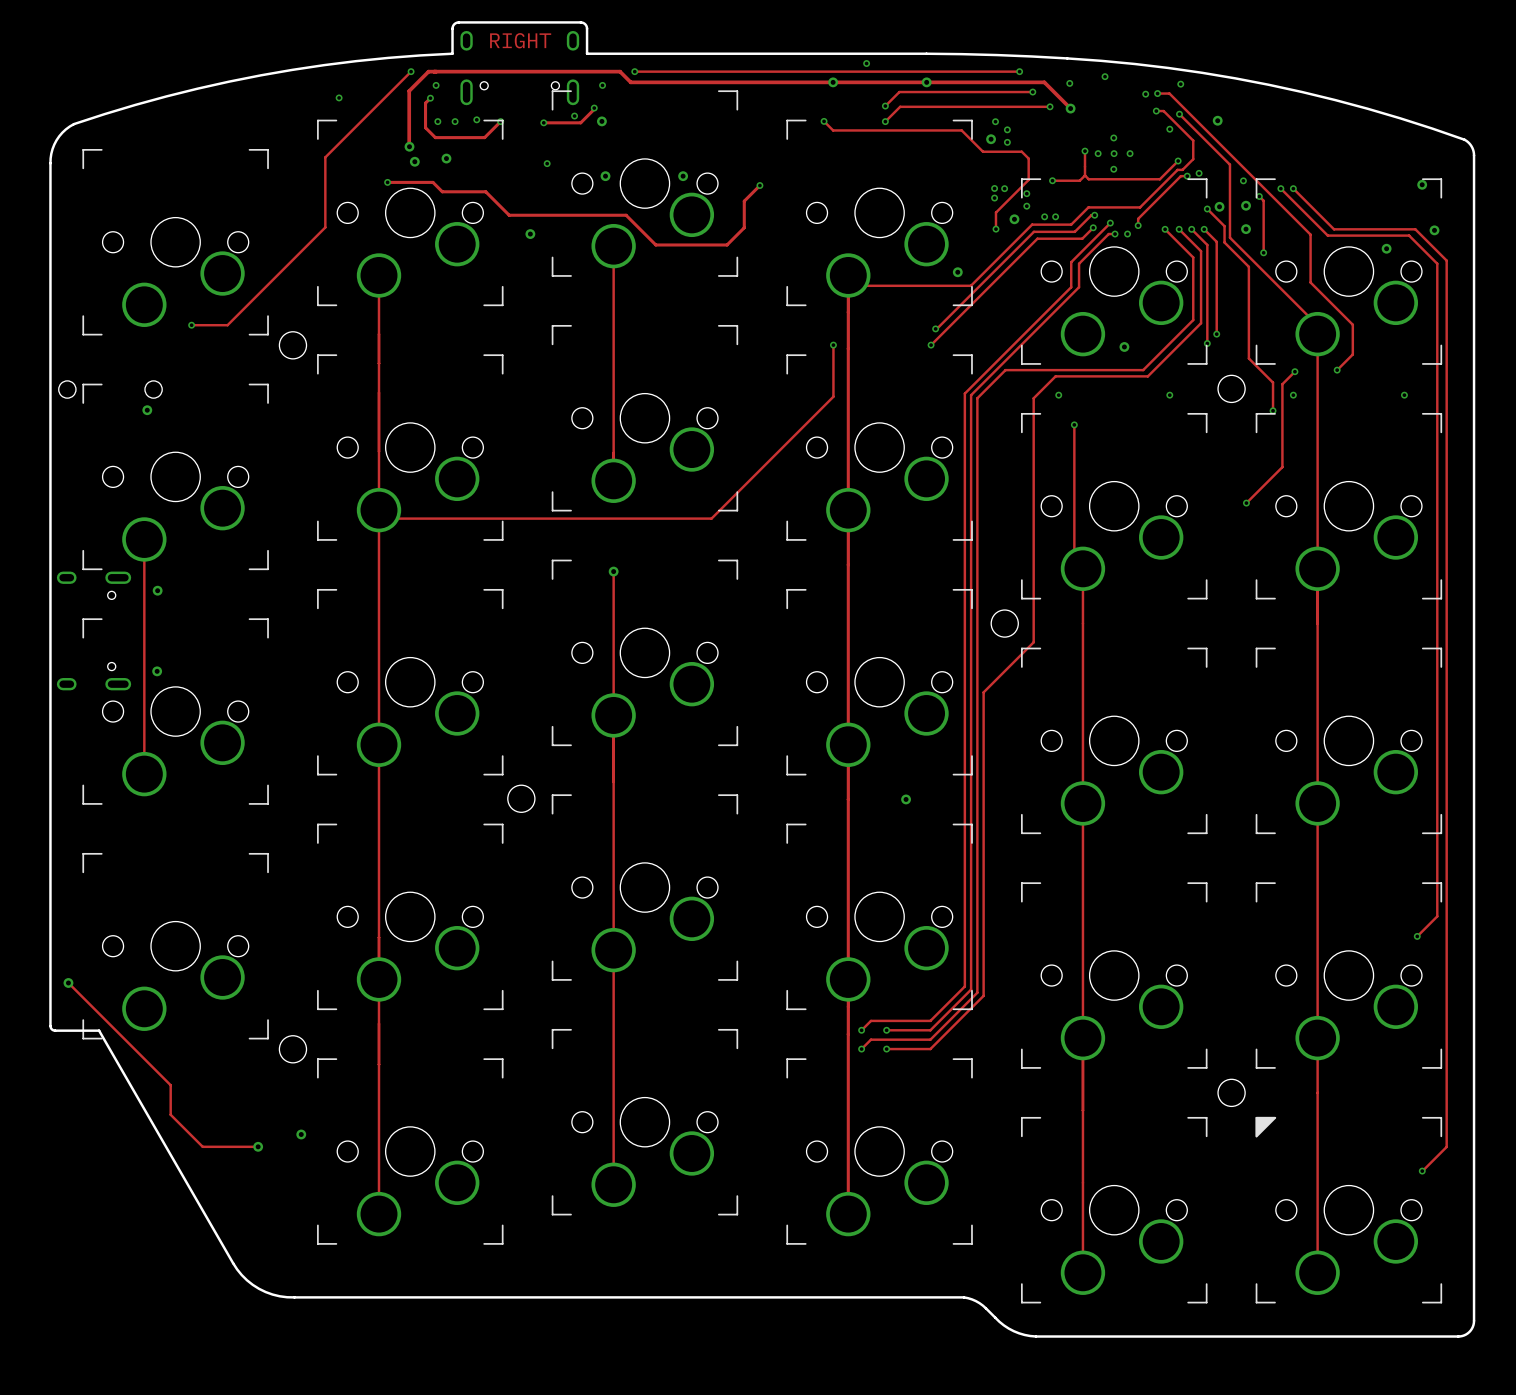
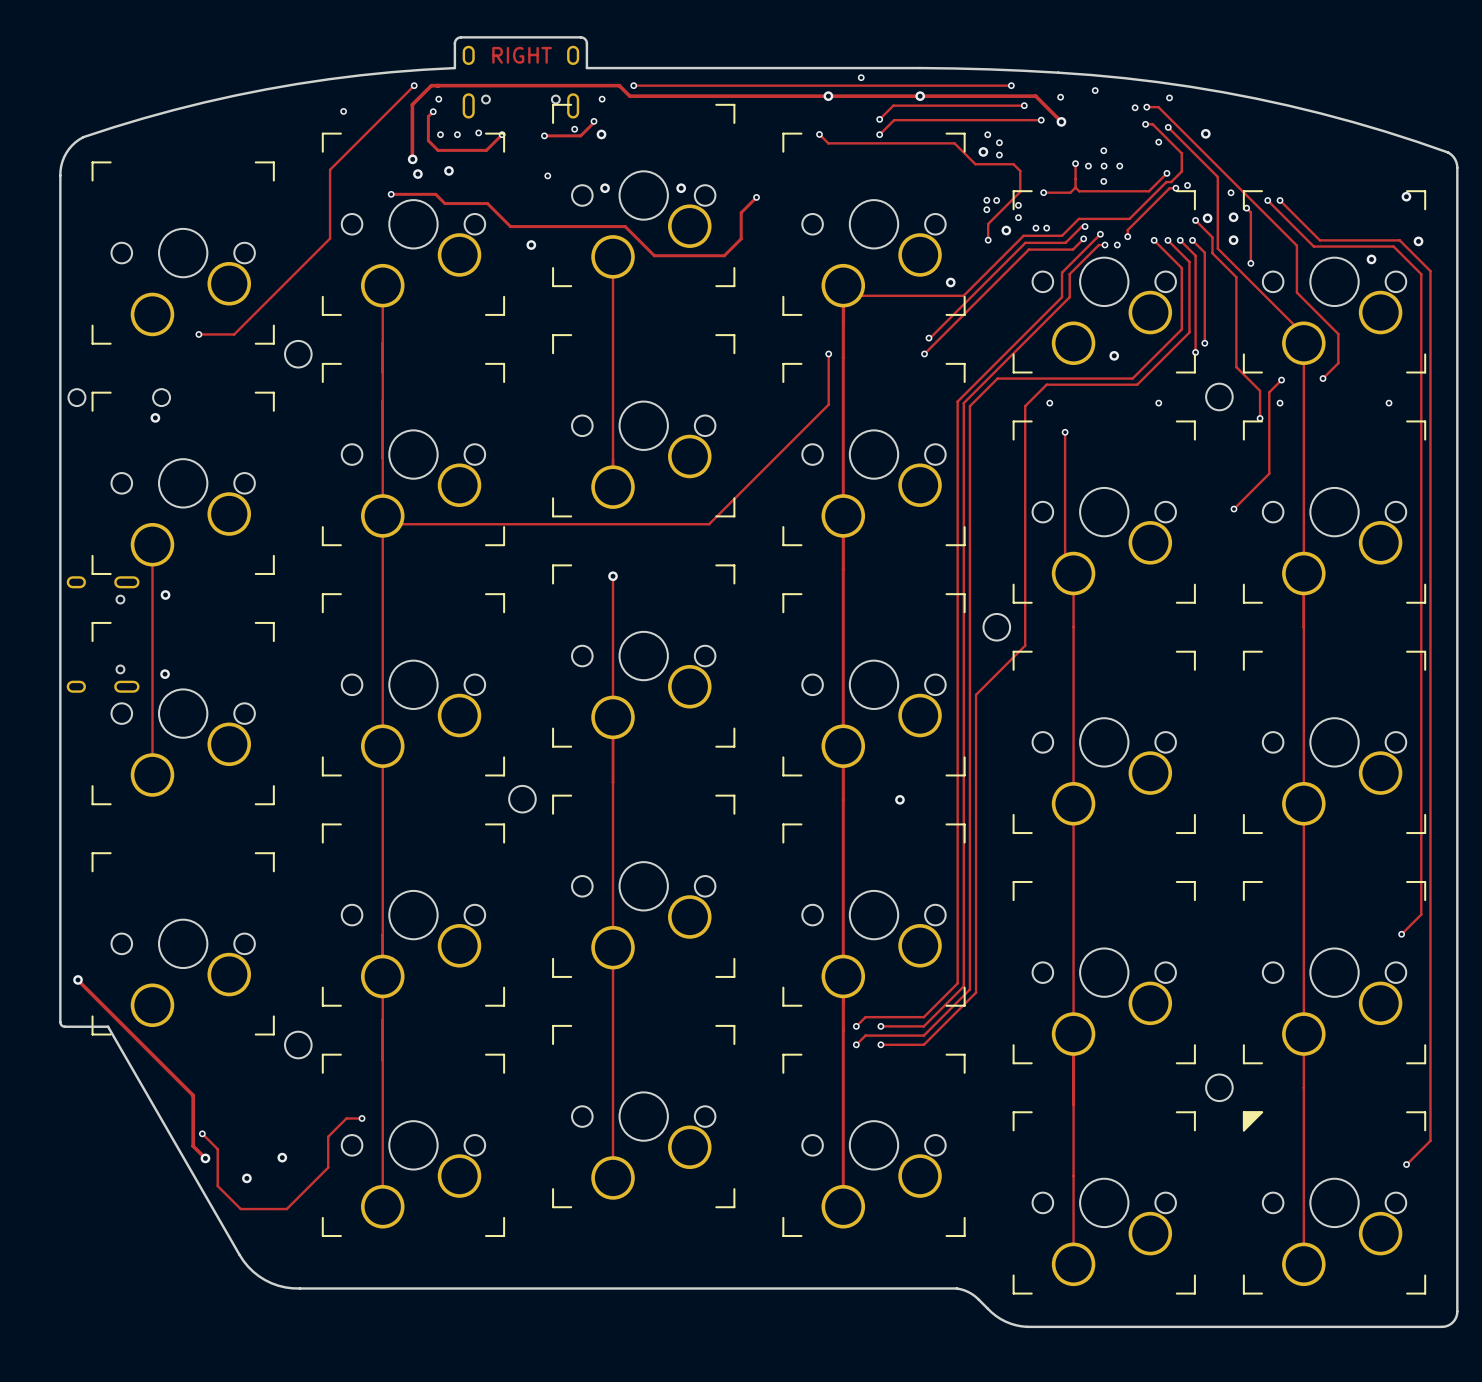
track: (68, 982) (170, 1085) (170, 1114) (202, 1146) (258, 1146) -> (78, 980) (193, 1095) (193, 1146) (205, 1158)
track: none -> (362, 1118) (346, 1118) (328, 1136) (328, 1167) (286, 1209) (240, 1209) (217, 1186) (217, 1149) (202, 1133)
via: none -> (362, 1118)
via: (301, 1134) -> none
via: none -> (202, 1133)
via: (258, 1146) -> none
via: none -> (205, 1158)
via: none -> (282, 1157)
via: none -> (246, 1178)

